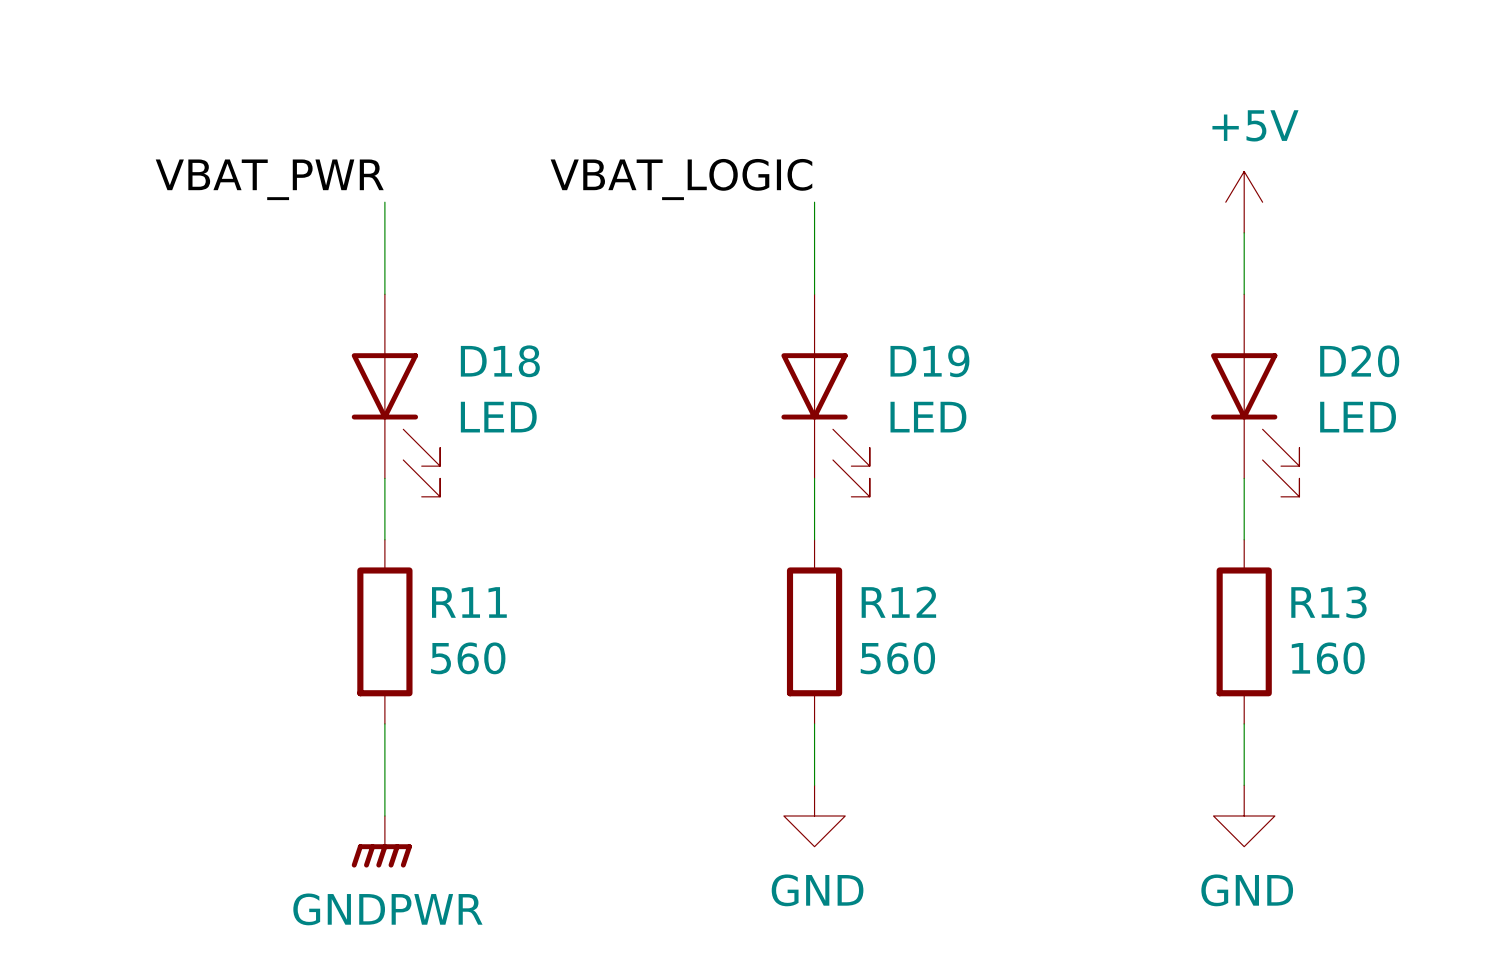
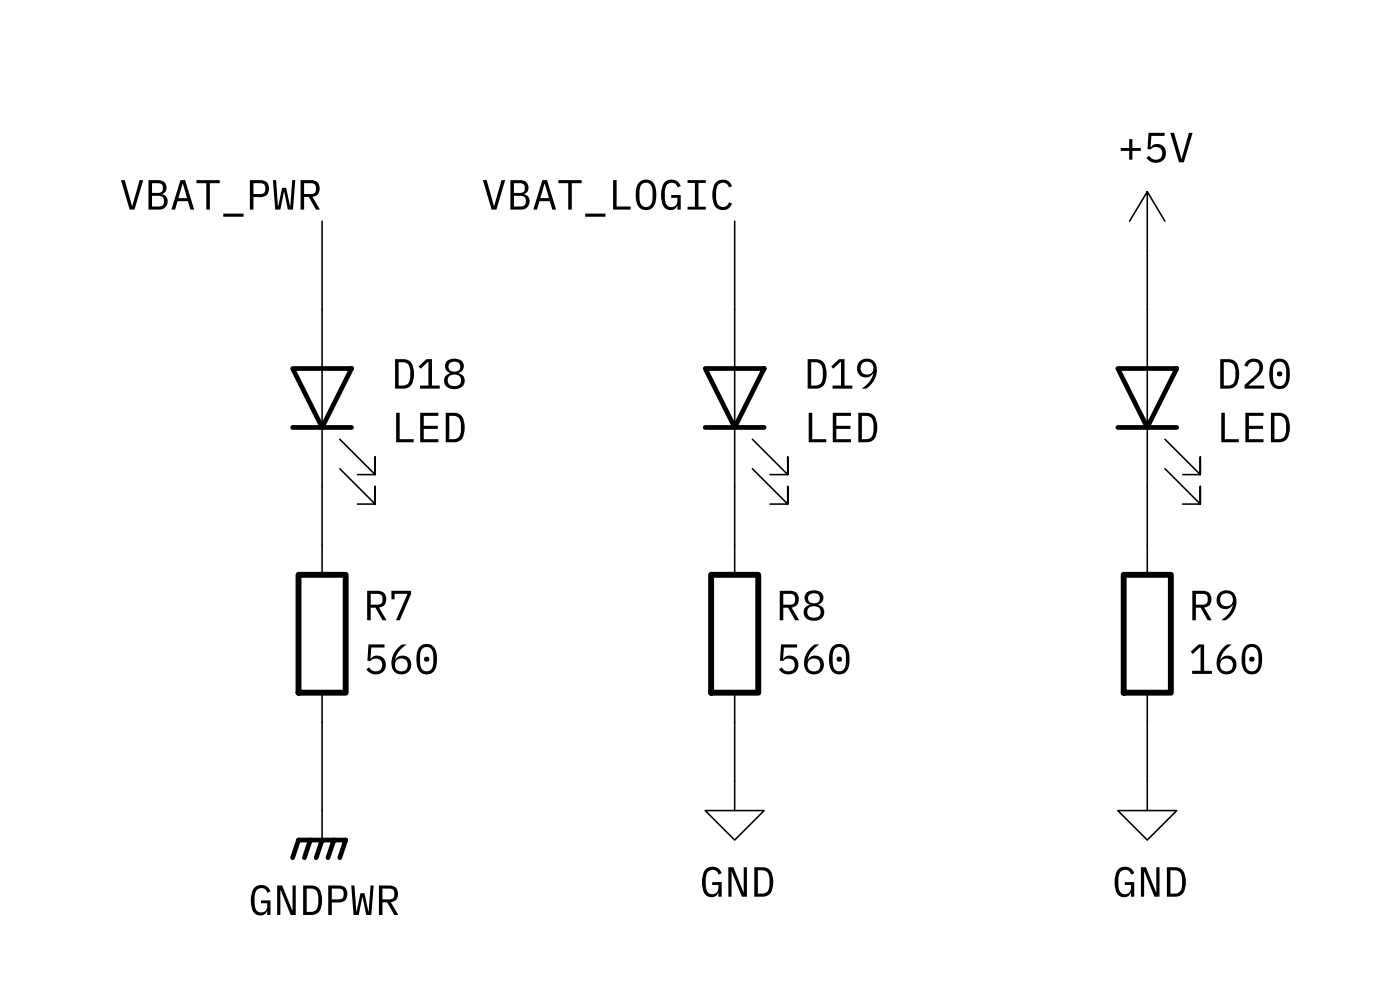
R11 name: R11 (469, 602) -> R7 (389, 605)
R12 name: R12 (898, 602) -> R8 (802, 605)
R13 name: R13 (1328, 602) -> R9 (1214, 605)

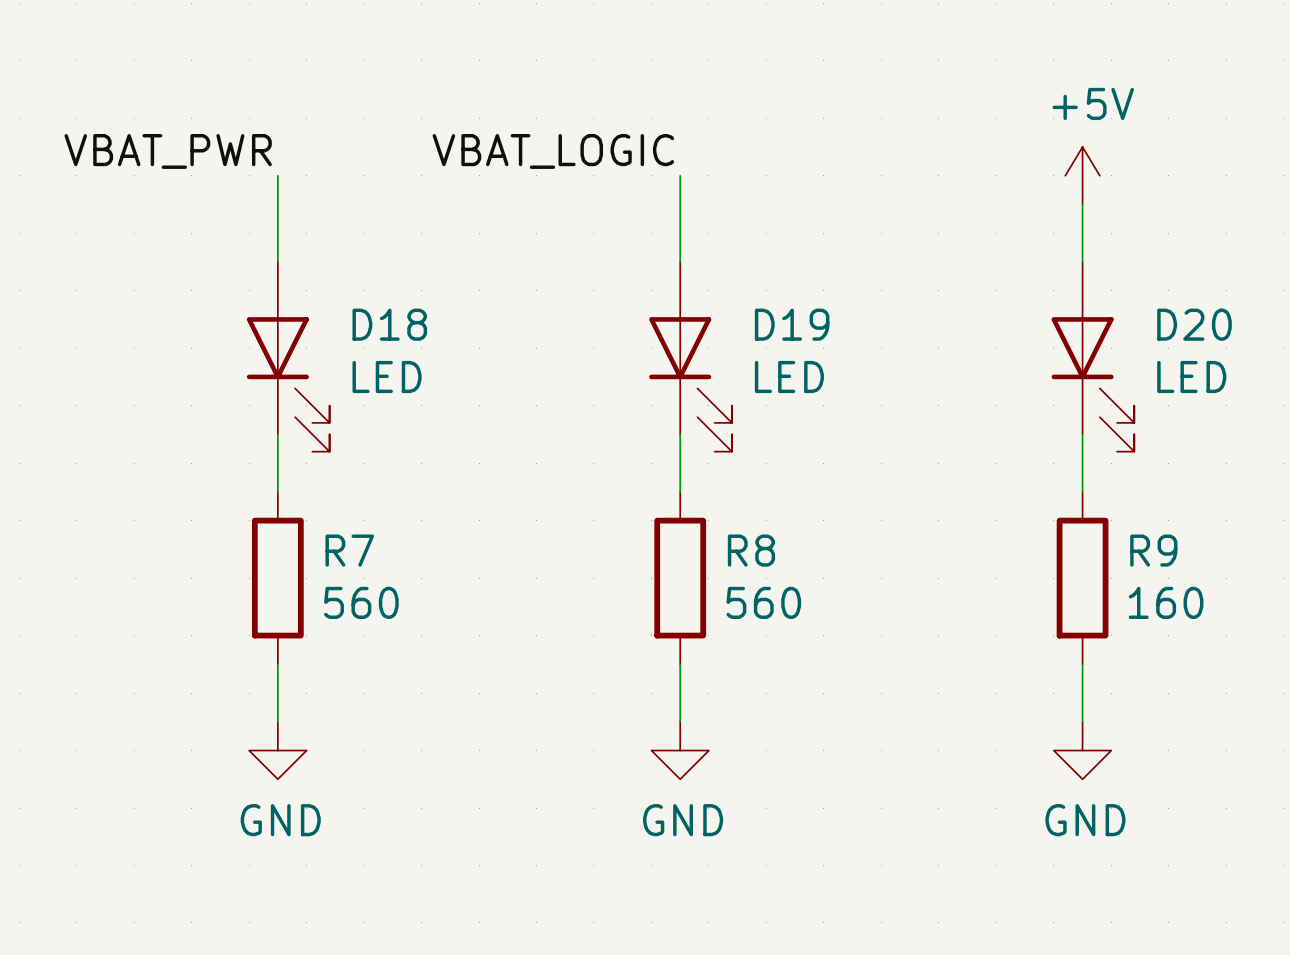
power symbol: none -> GND (277, 750)
power symbol: GNDPWR (319, 835) -> none

